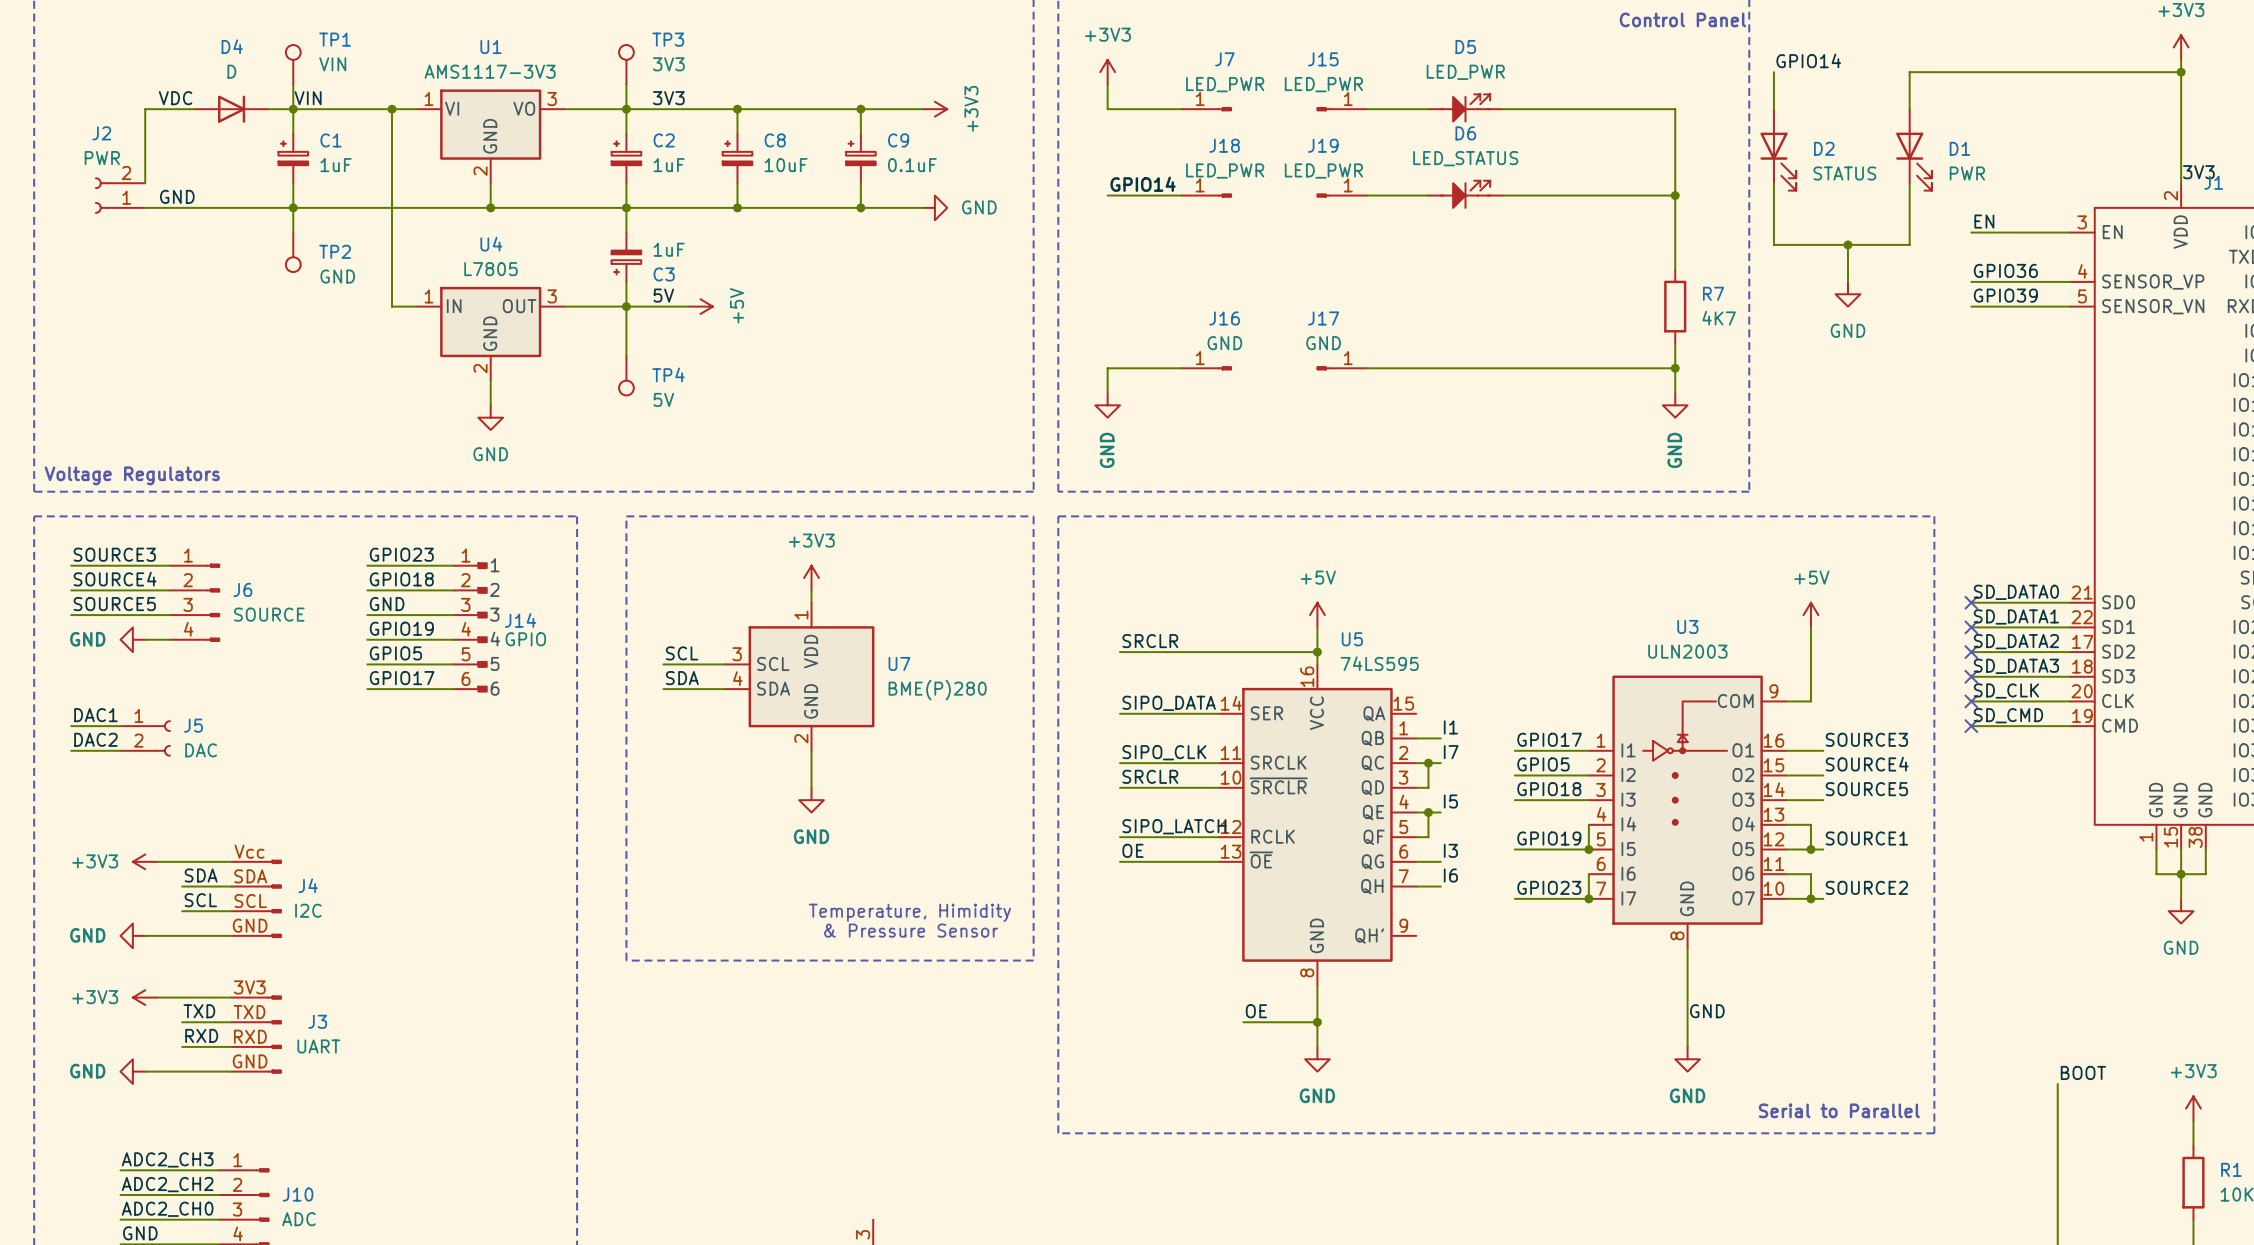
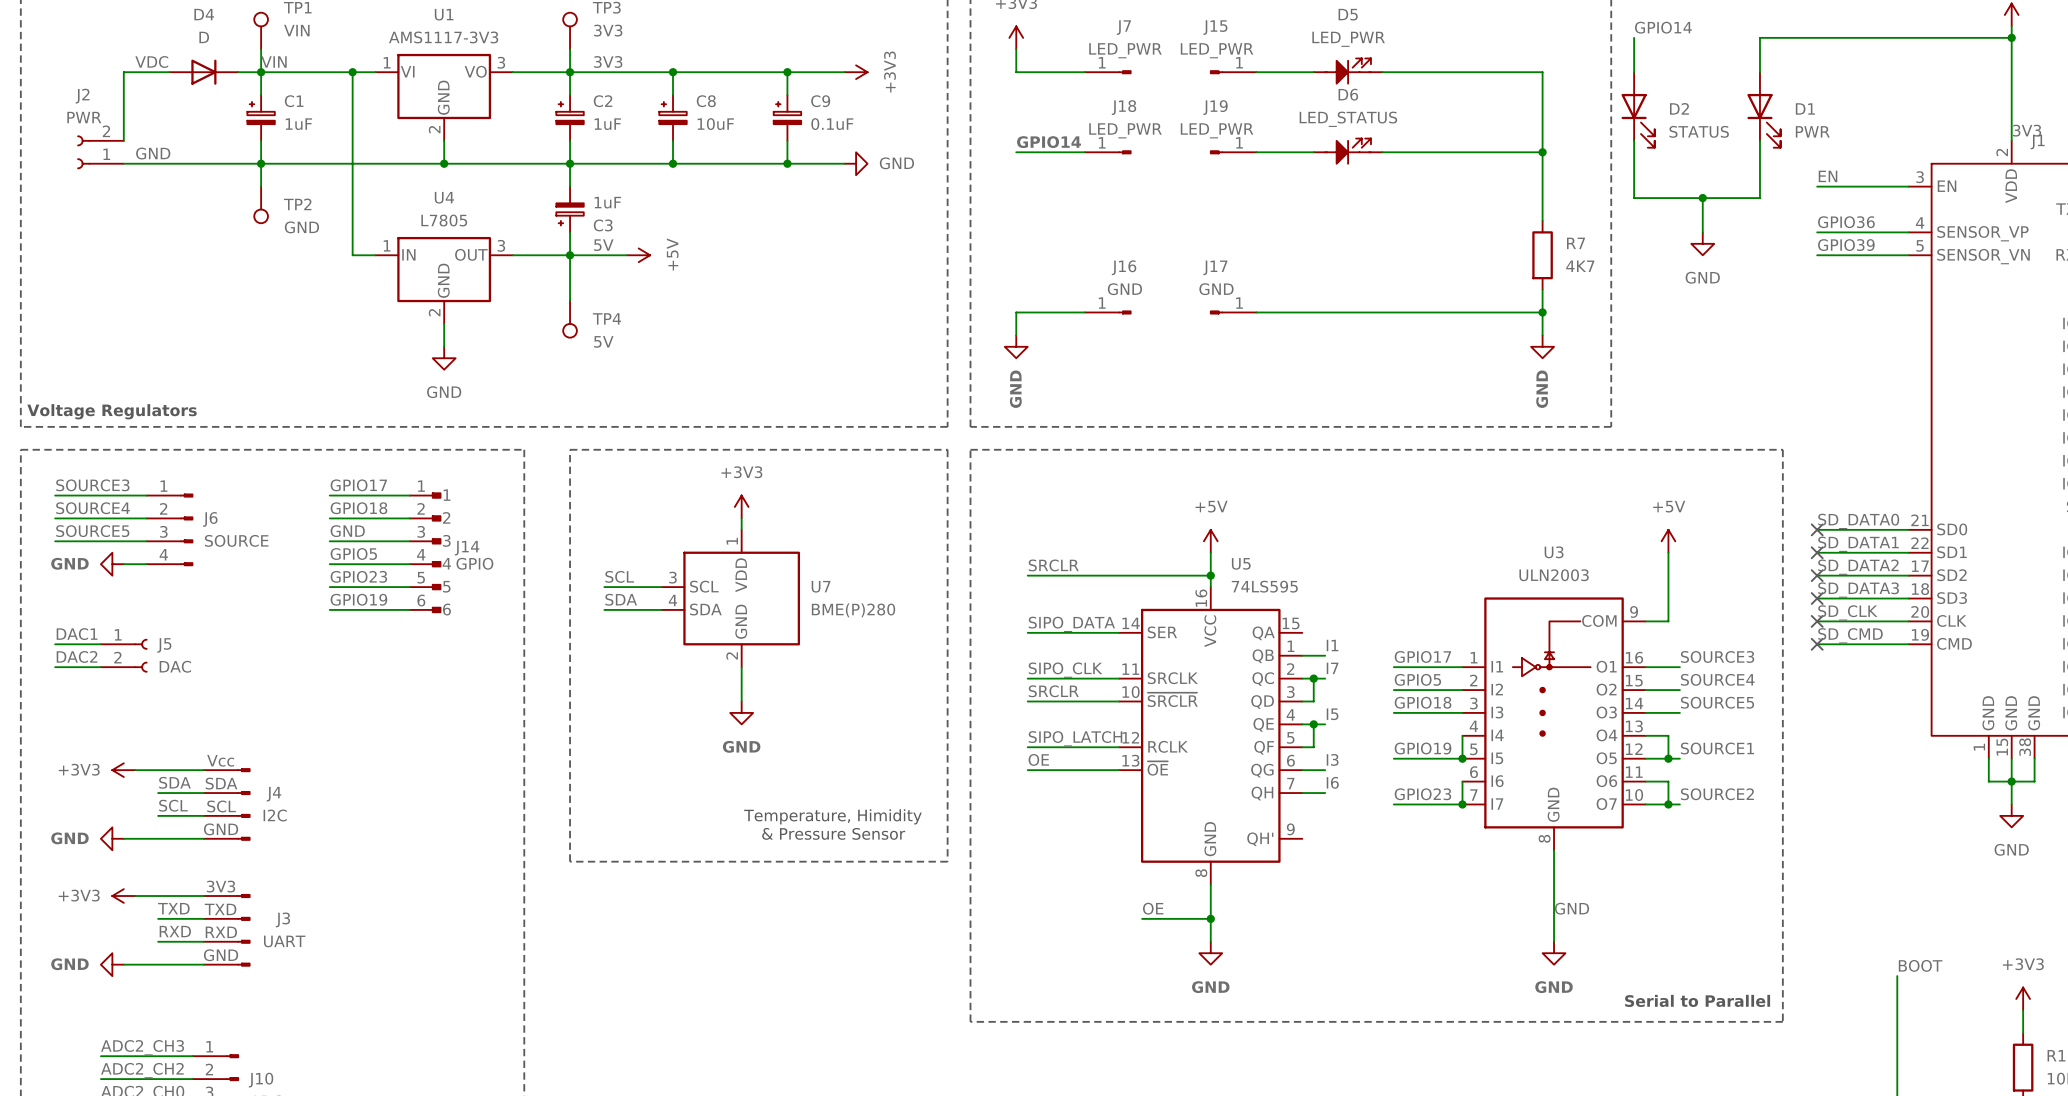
label: GPIO23 (401, 554) -> GPIO17 (358, 485)
label: GPIO19 (401, 628) -> GPIO5 (353, 553)
label: GPIO5 (395, 653) -> GPIO23 (358, 576)
label: GPIO17 (402, 678) -> GPIO19 (358, 599)

